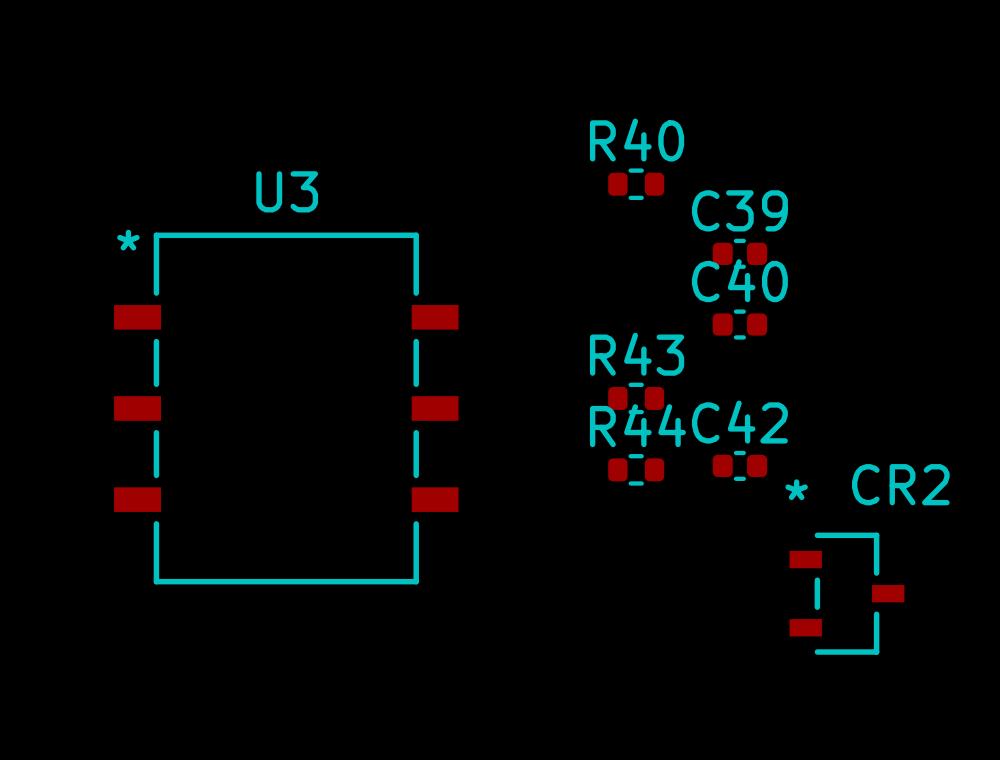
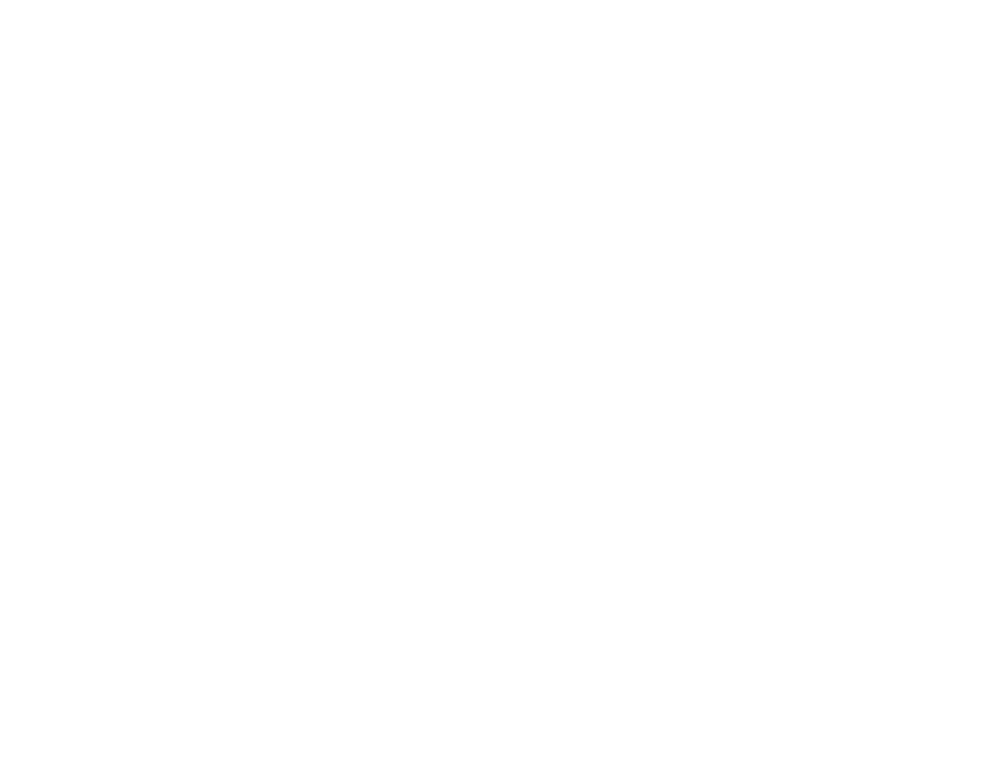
R40: (636, 184) -> none
C39: (739, 253) -> none
C40: (739, 324) -> none
R43: (636, 398) -> none
U3: (286, 408) -> none
C42: (739, 465) -> none
R44: (636, 469) -> none
CR2: (846, 593) -> none

